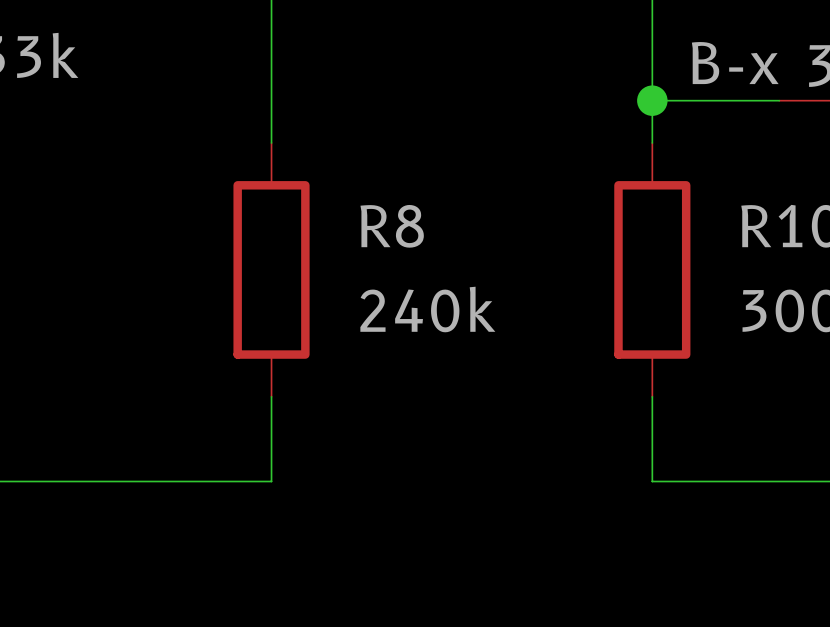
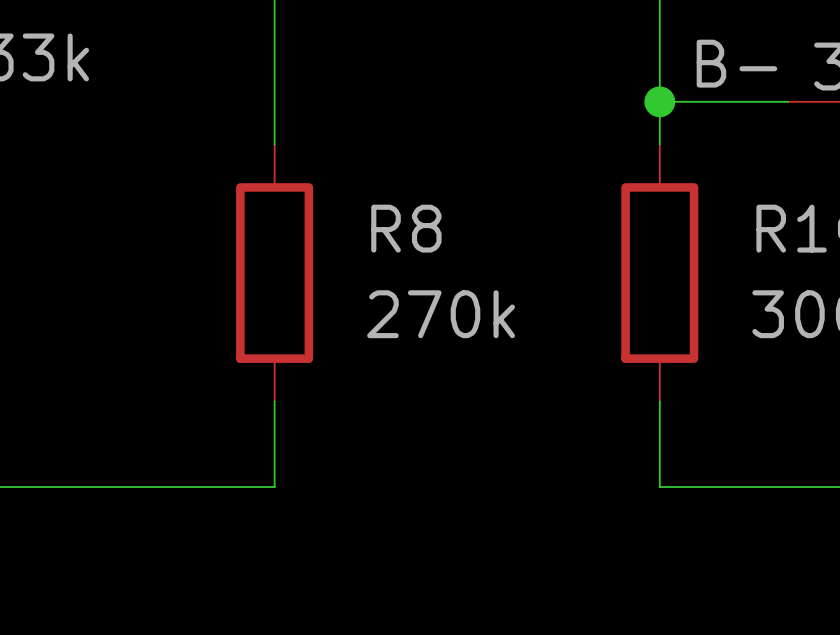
label: B-x (735, 63) -> B- (736, 63)
R8 value: 240k (427, 309) -> 270k (441, 314)

